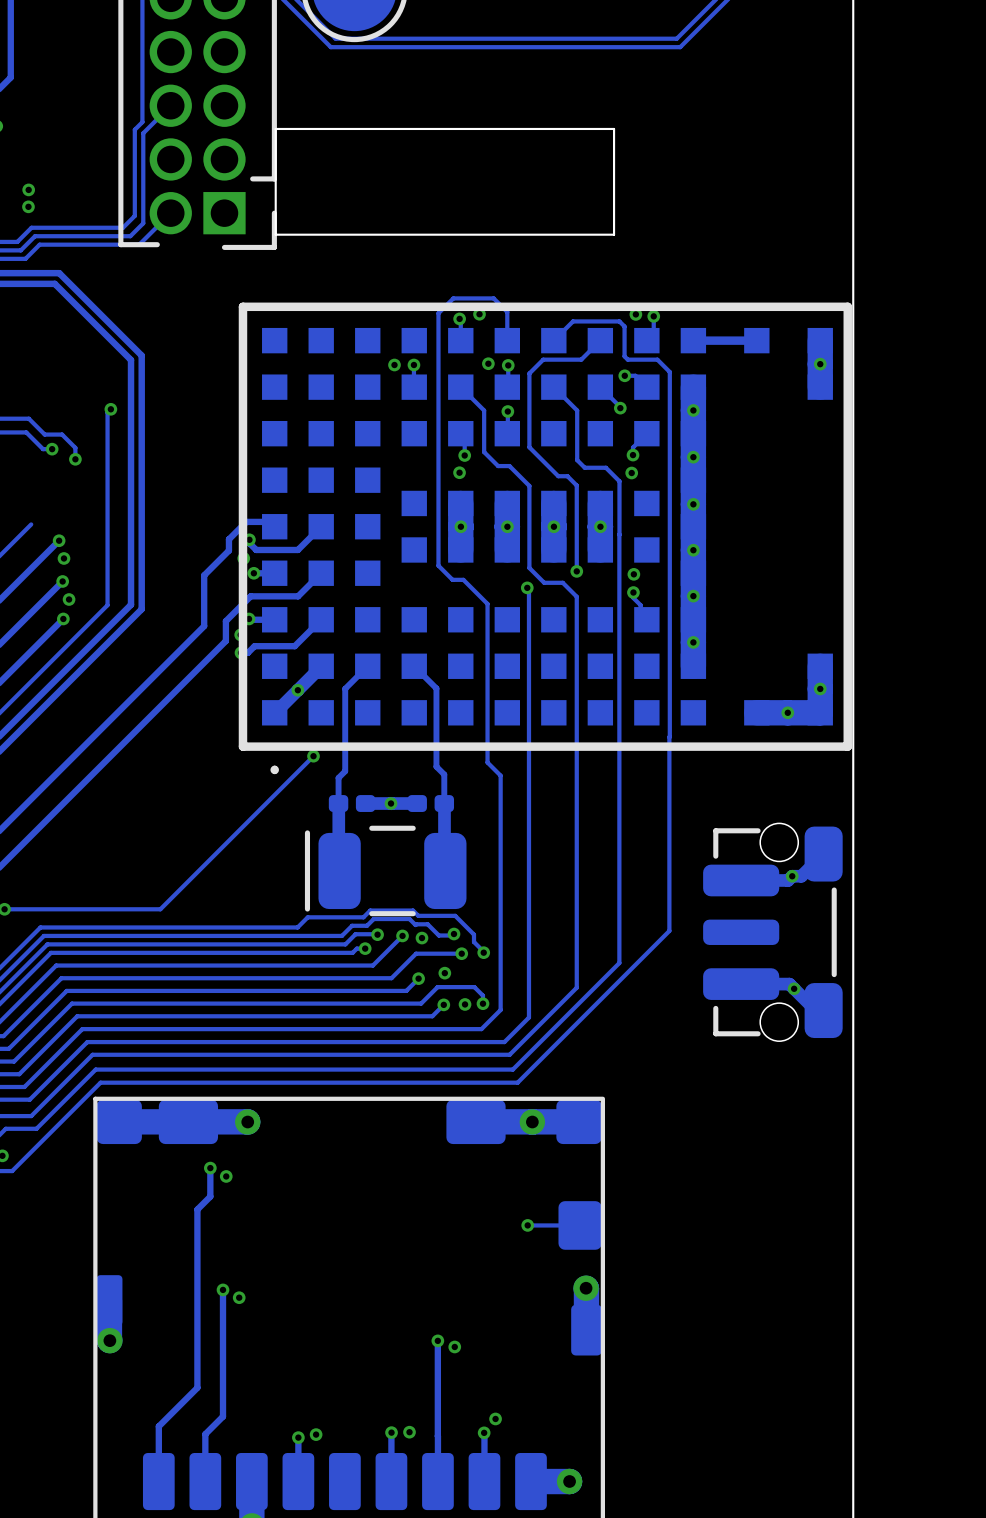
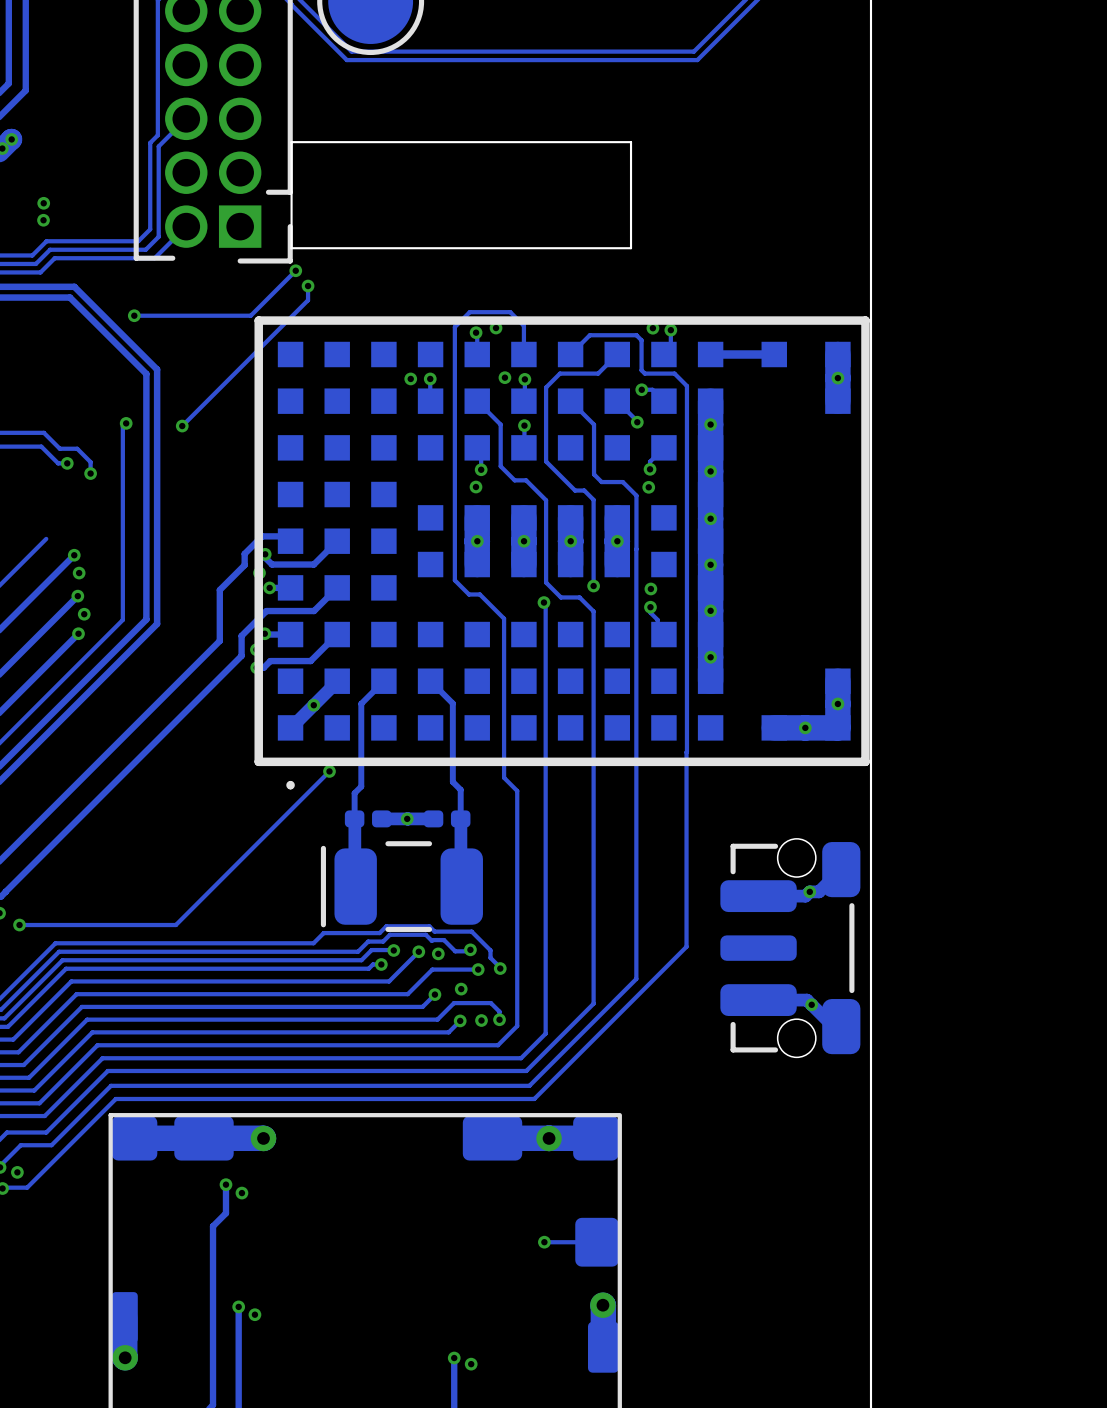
track: none -> (295, 270) (250, 315) (134, 315)
via: none -> (295, 270)
track: none -> (308, 286) (308, 300) (182, 426)
via: none -> (308, 286)
via: none -> (134, 315)
via: none -> (182, 426)

